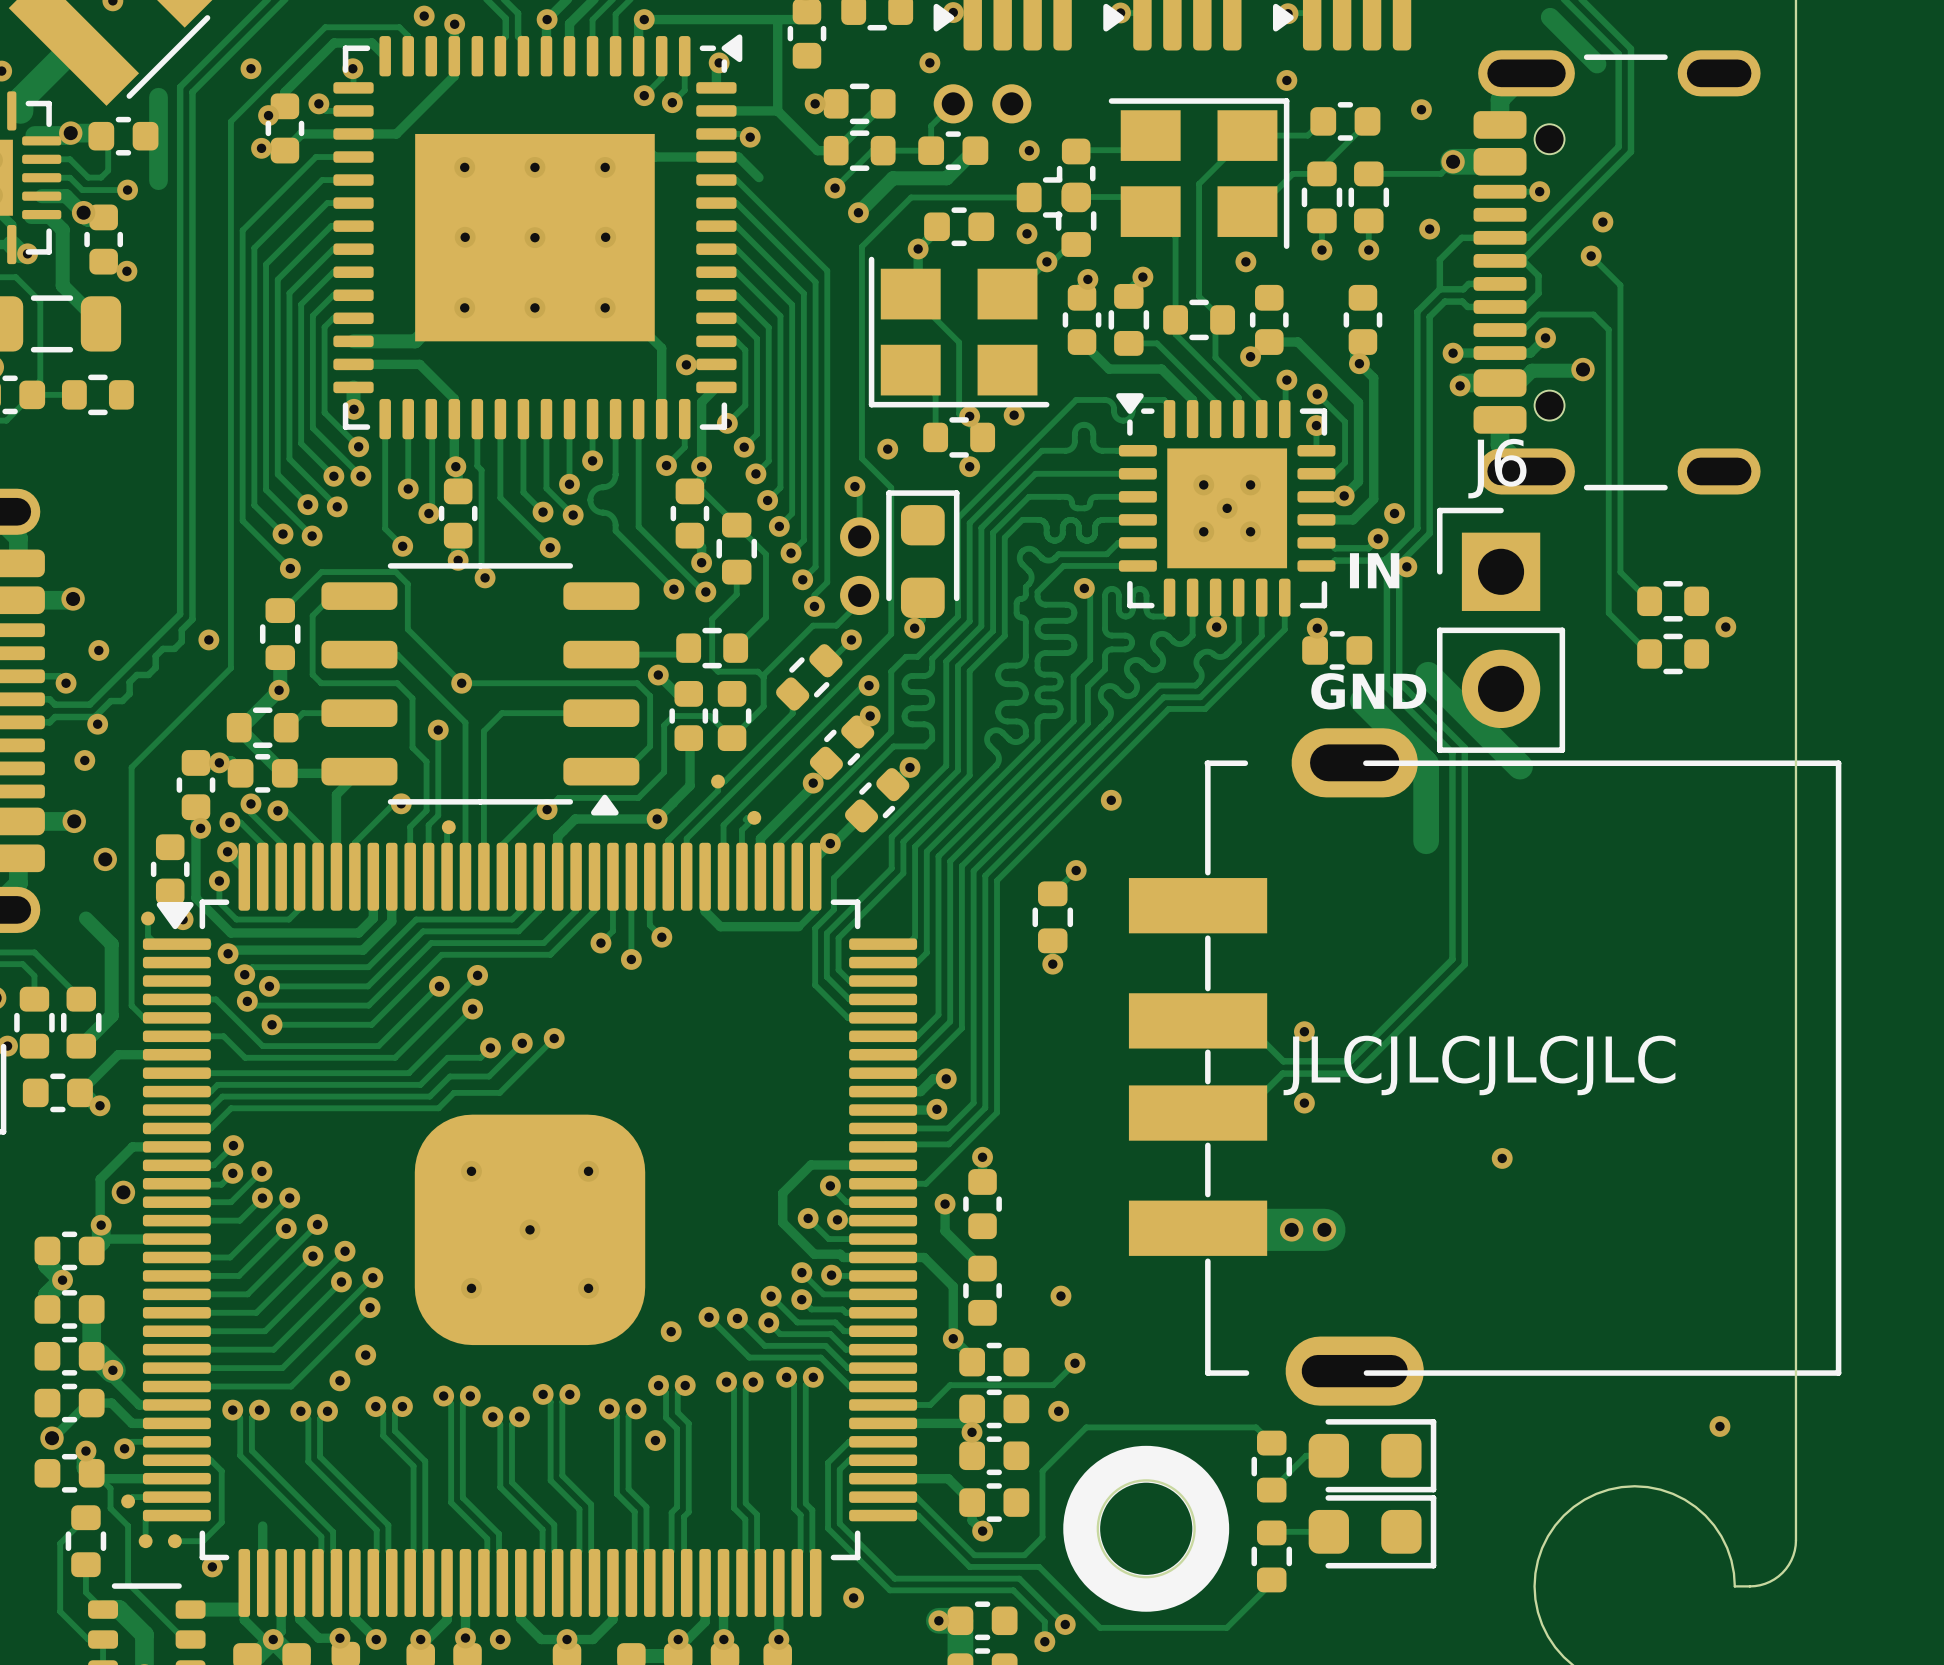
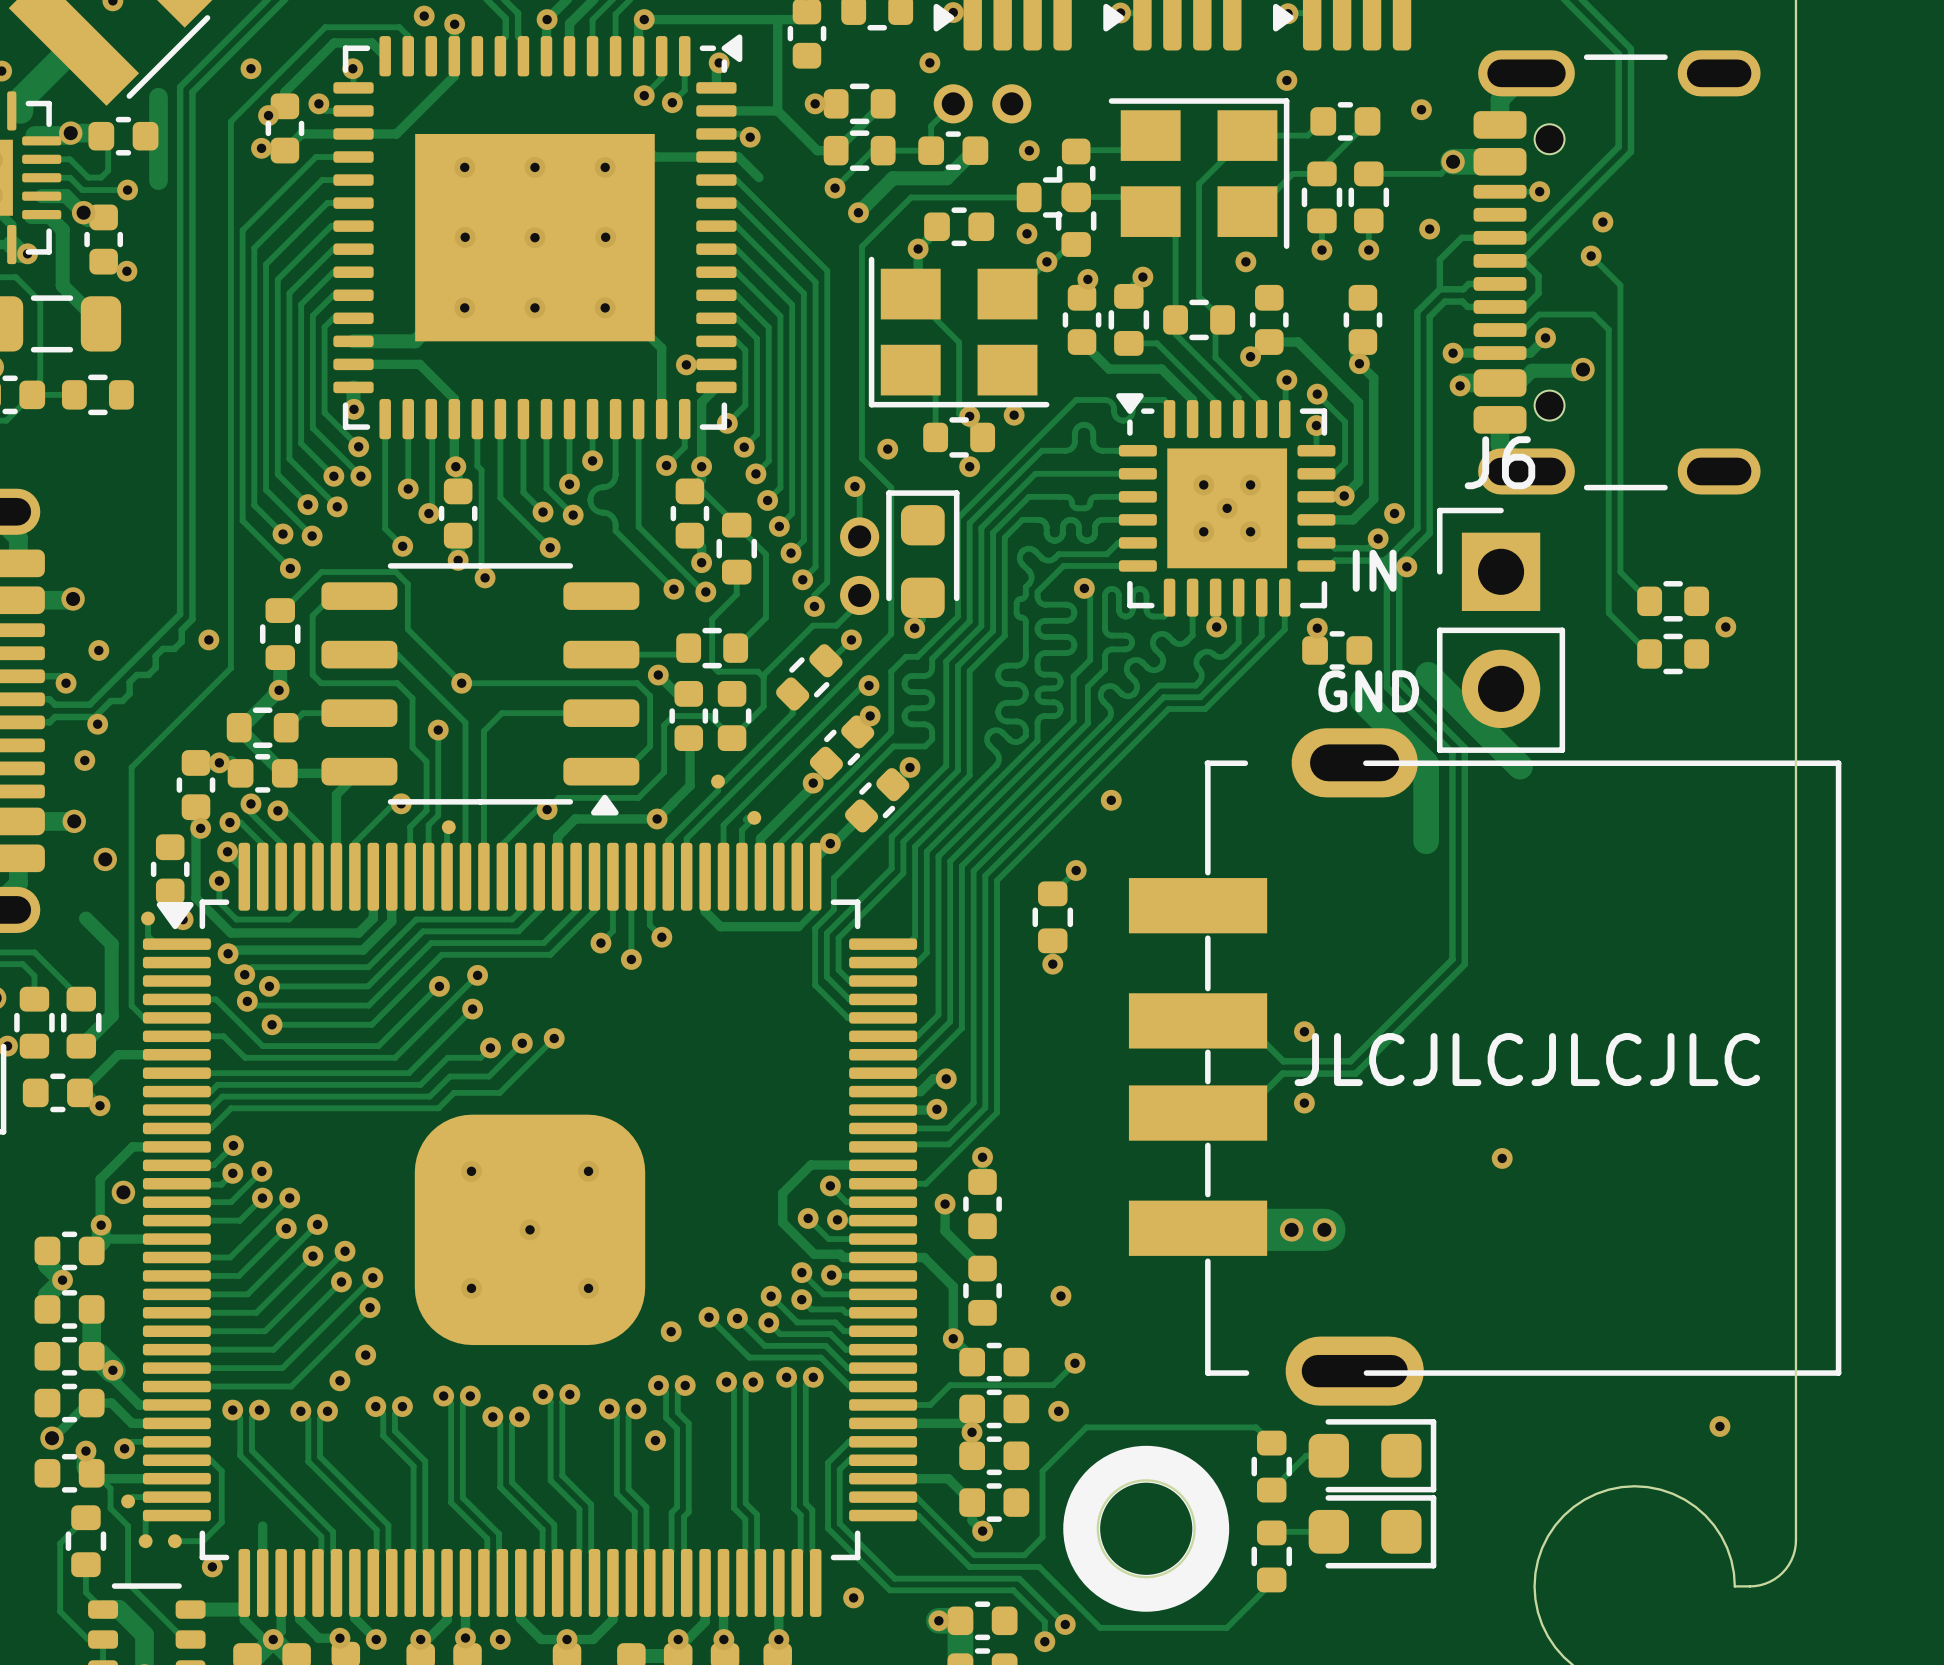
track: (1550, 17) (1597, 64) -> none

